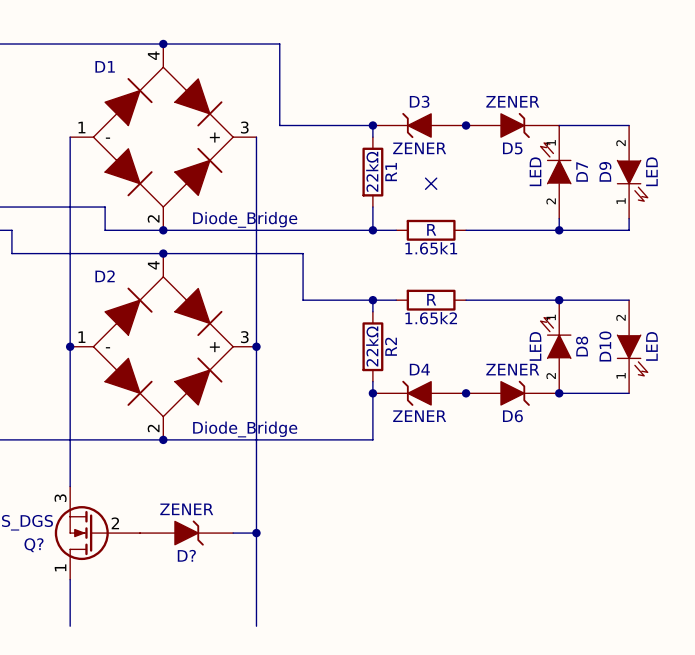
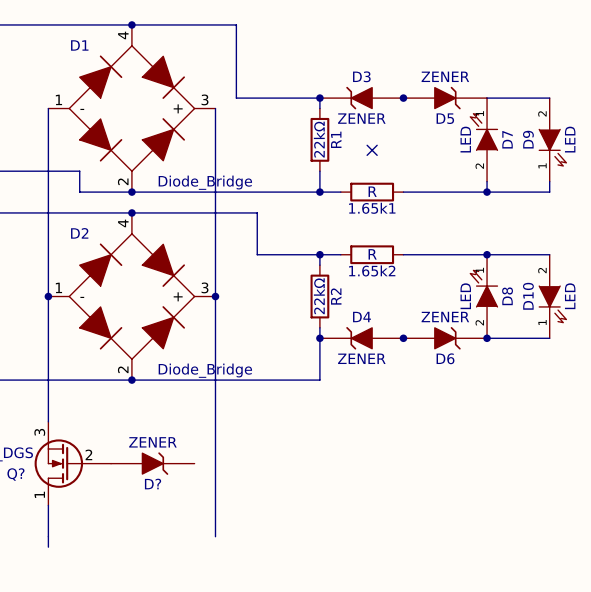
wire: (233, 533) (256, 533) -> none
junction: (256, 533) -> none
wire: (256, 614) (256, 626) -> none

